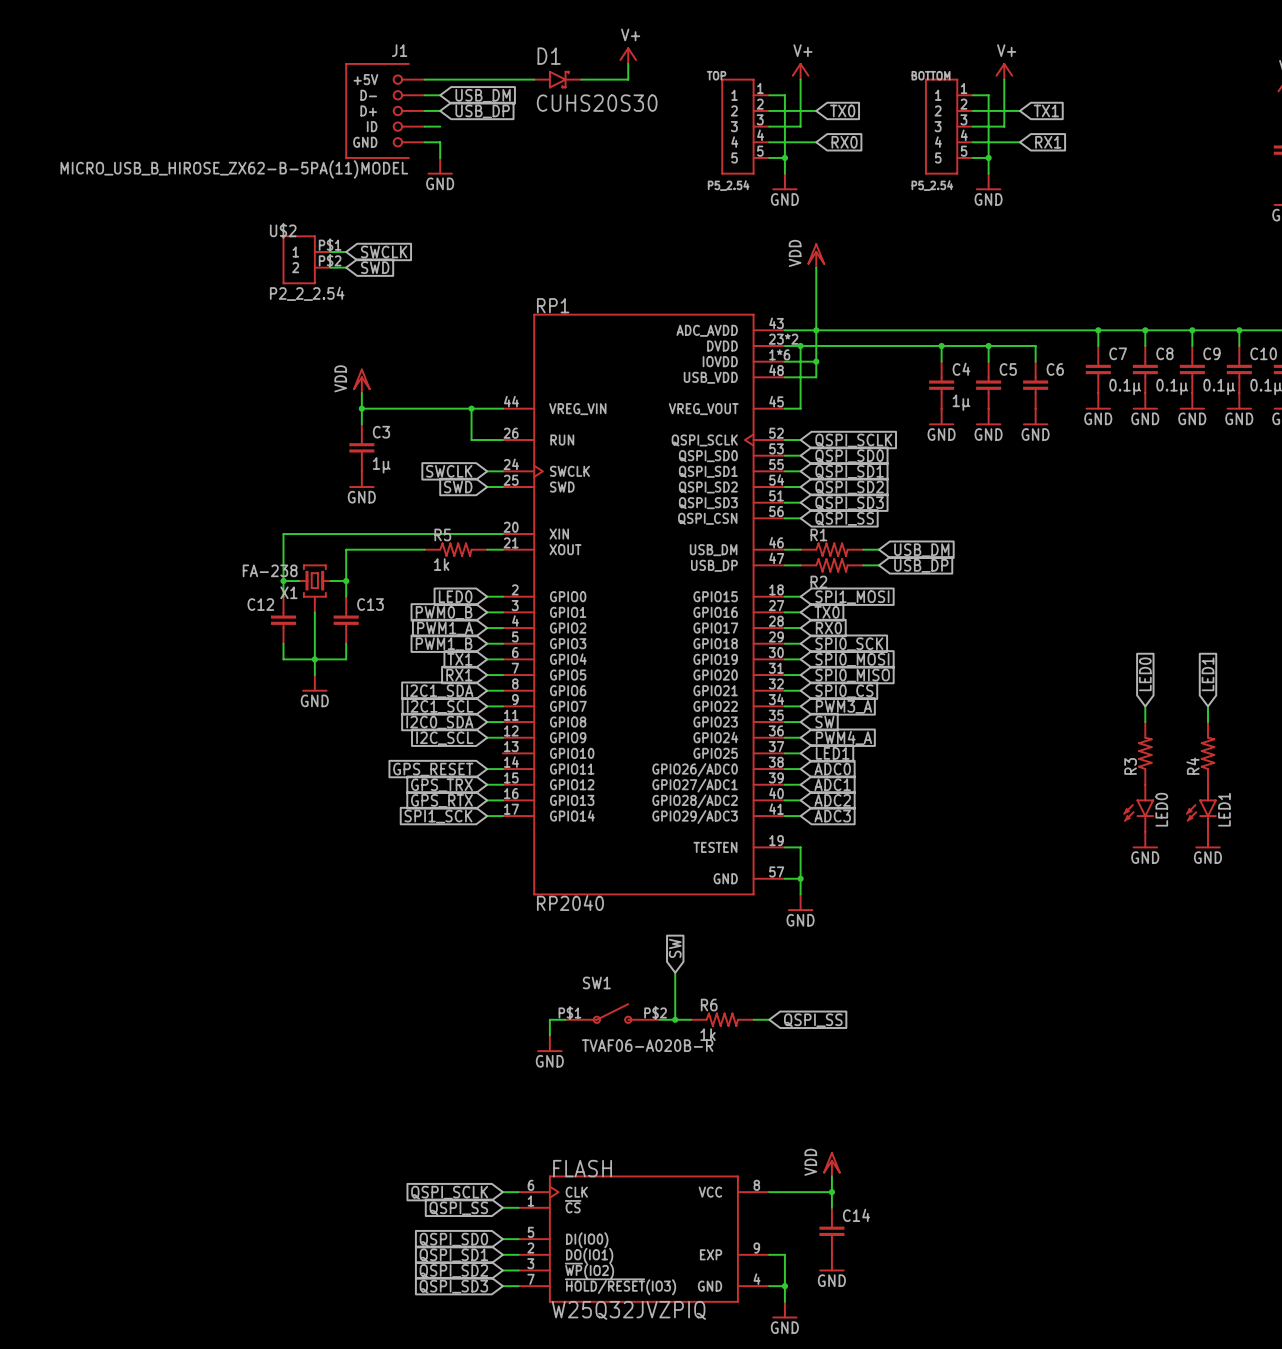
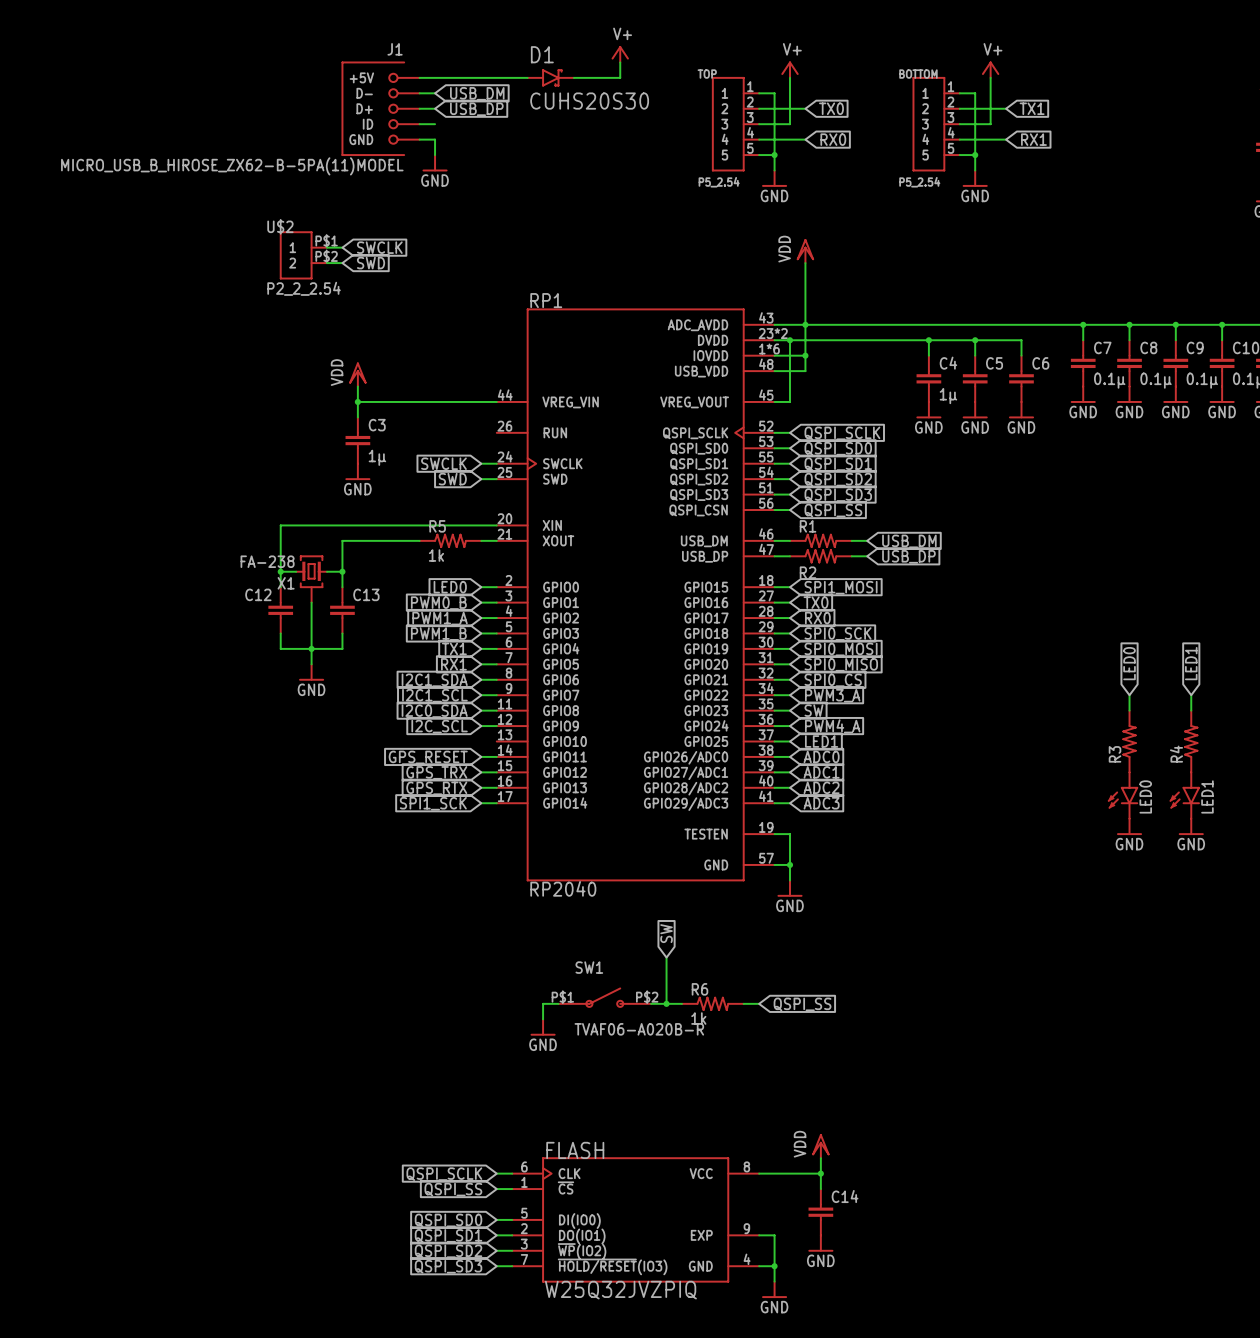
wire: (471, 408) (471, 440) (502, 440) -> none
junction: (471, 408) -> none

